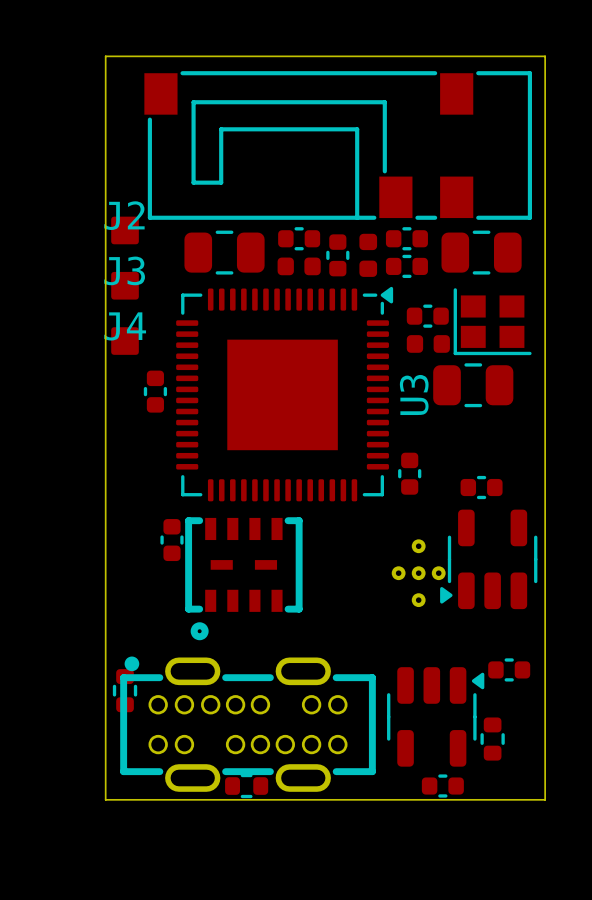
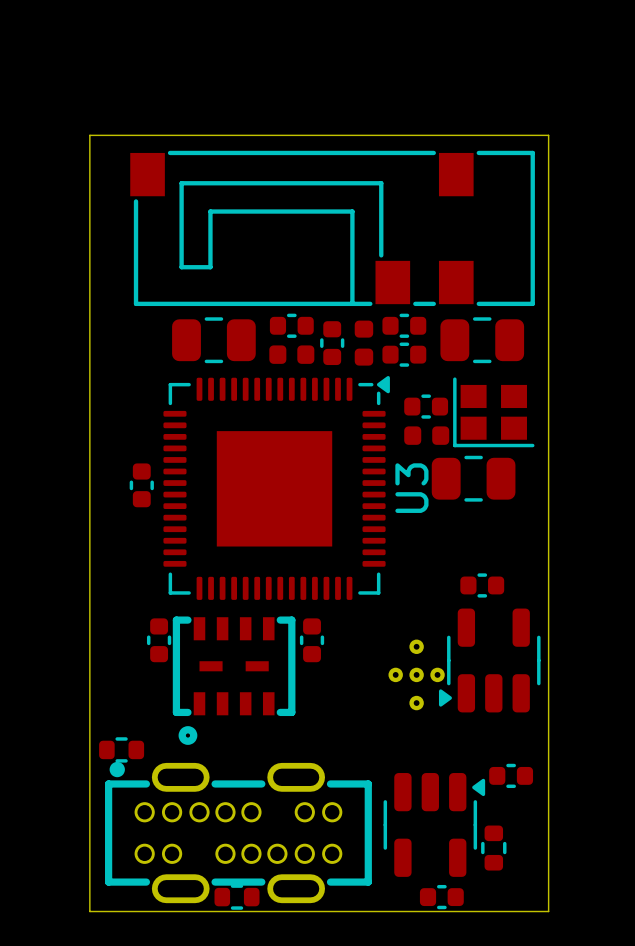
J2: (125, 230) -> none
J3: (125, 285) -> none
J4: (125, 341) -> none
part position: (409, 473) -> (312, 640)
part rotation: 0° (125, 690) -> 90° clockwise (121, 749)
part position: (125, 690) -> (121, 749)

